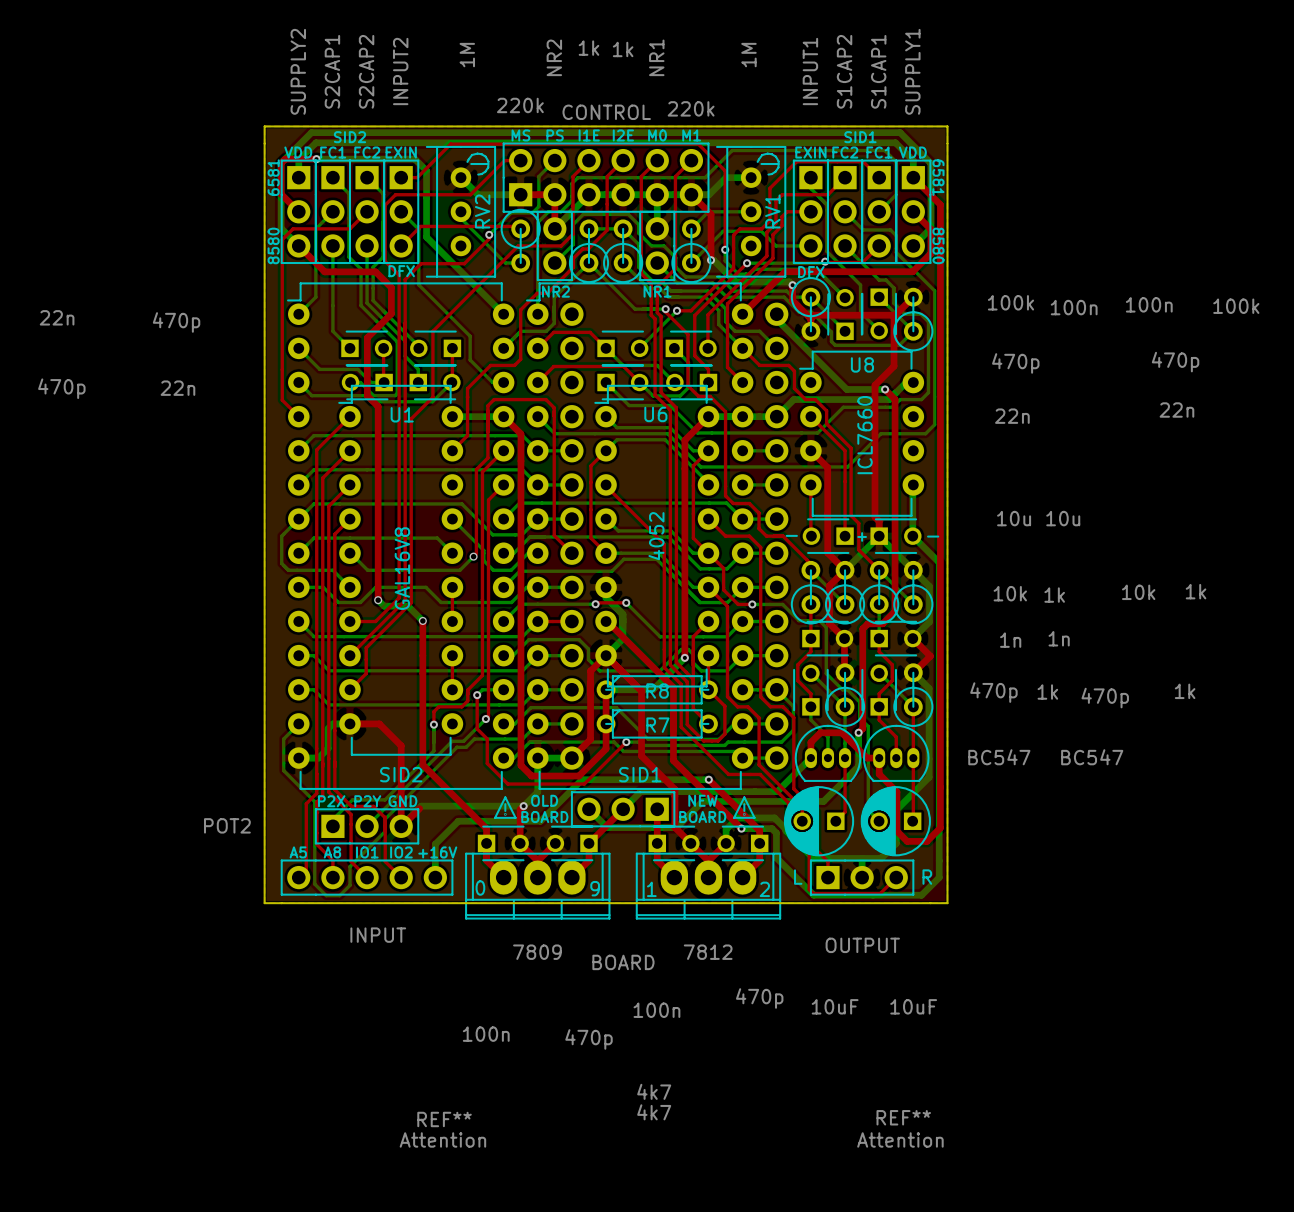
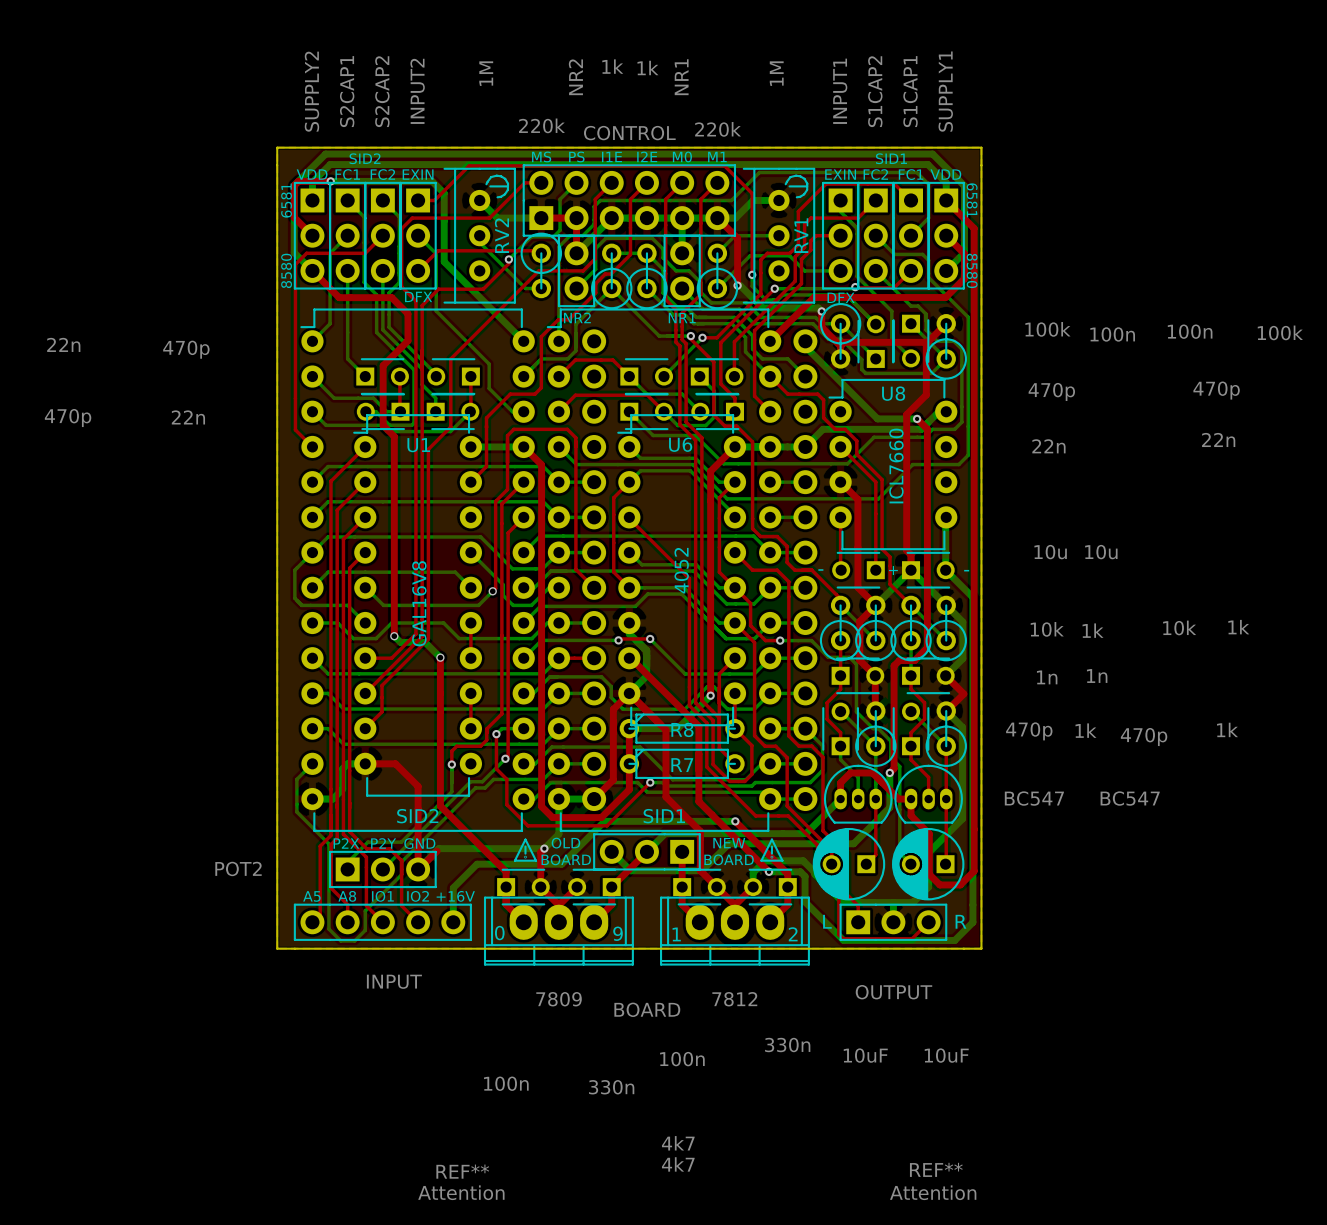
part value: 470p (759, 998) -> 330n (787, 1045)
part value: 470p (588, 1039) -> 330n (611, 1087)

